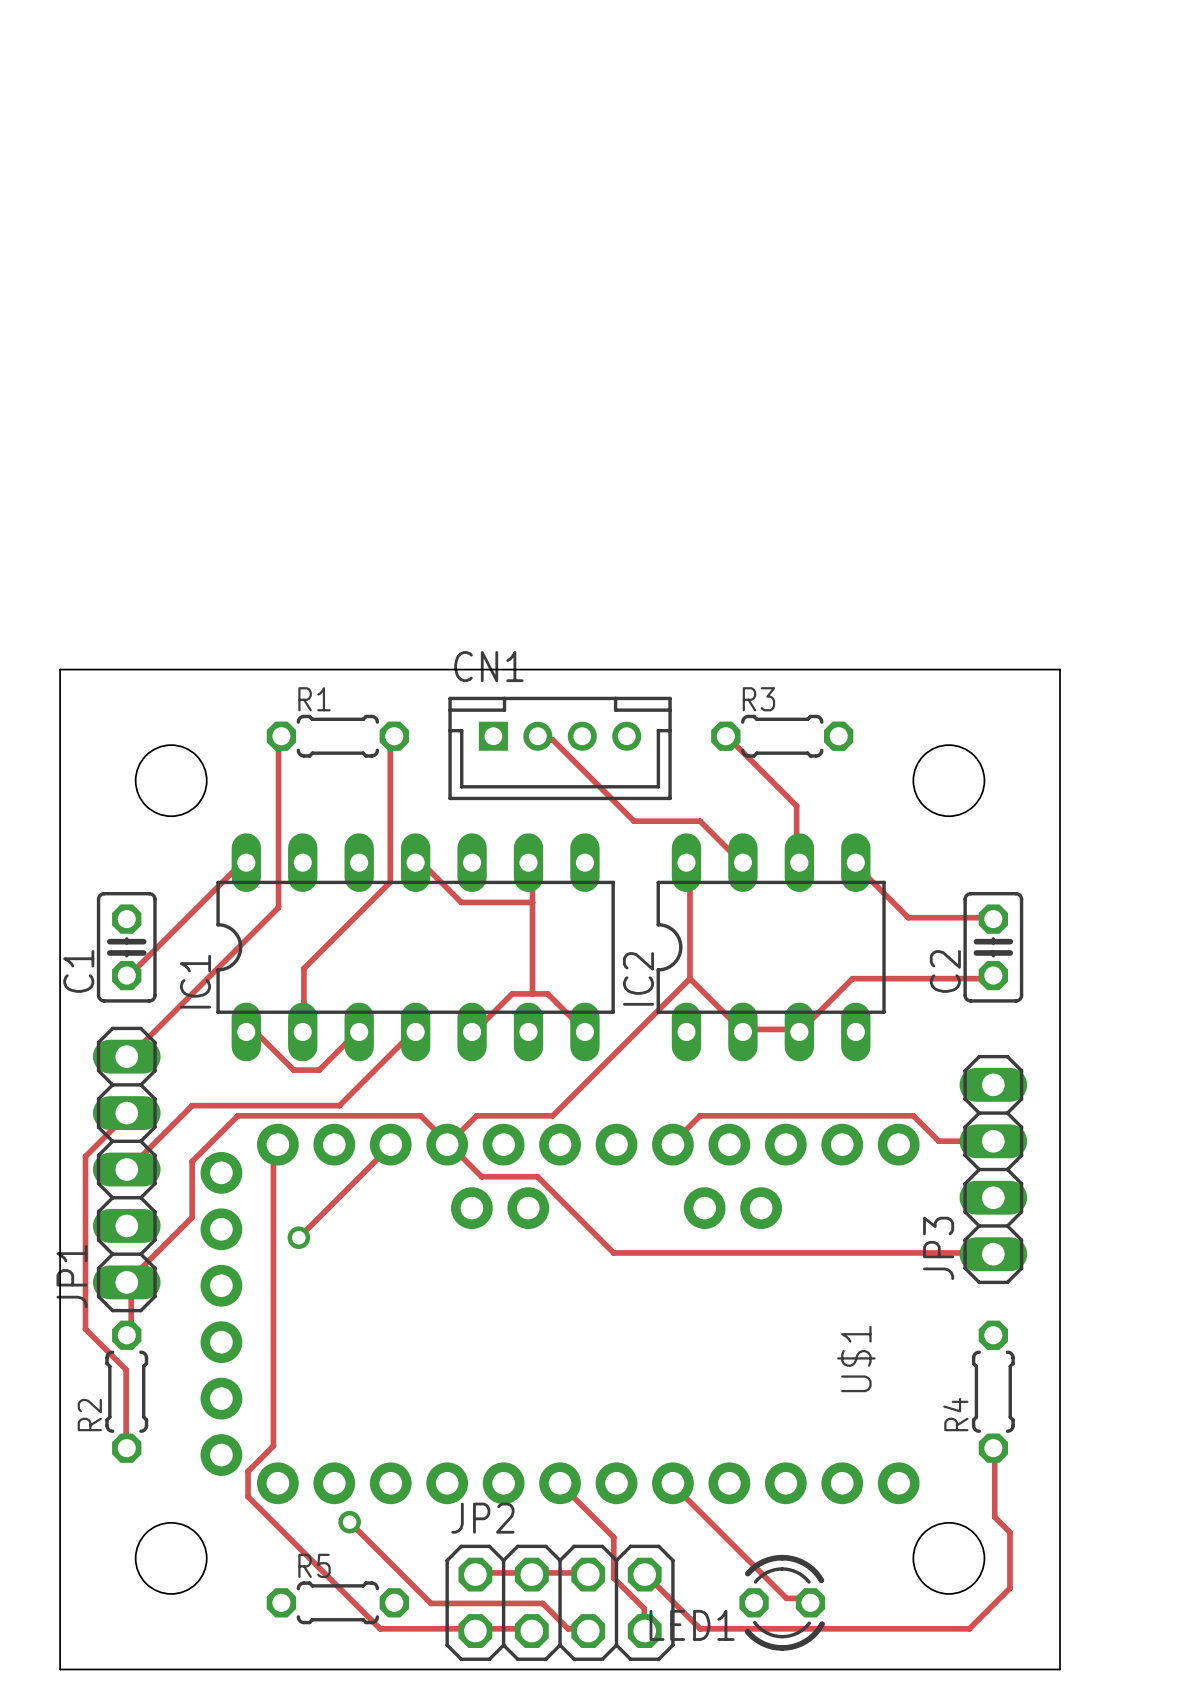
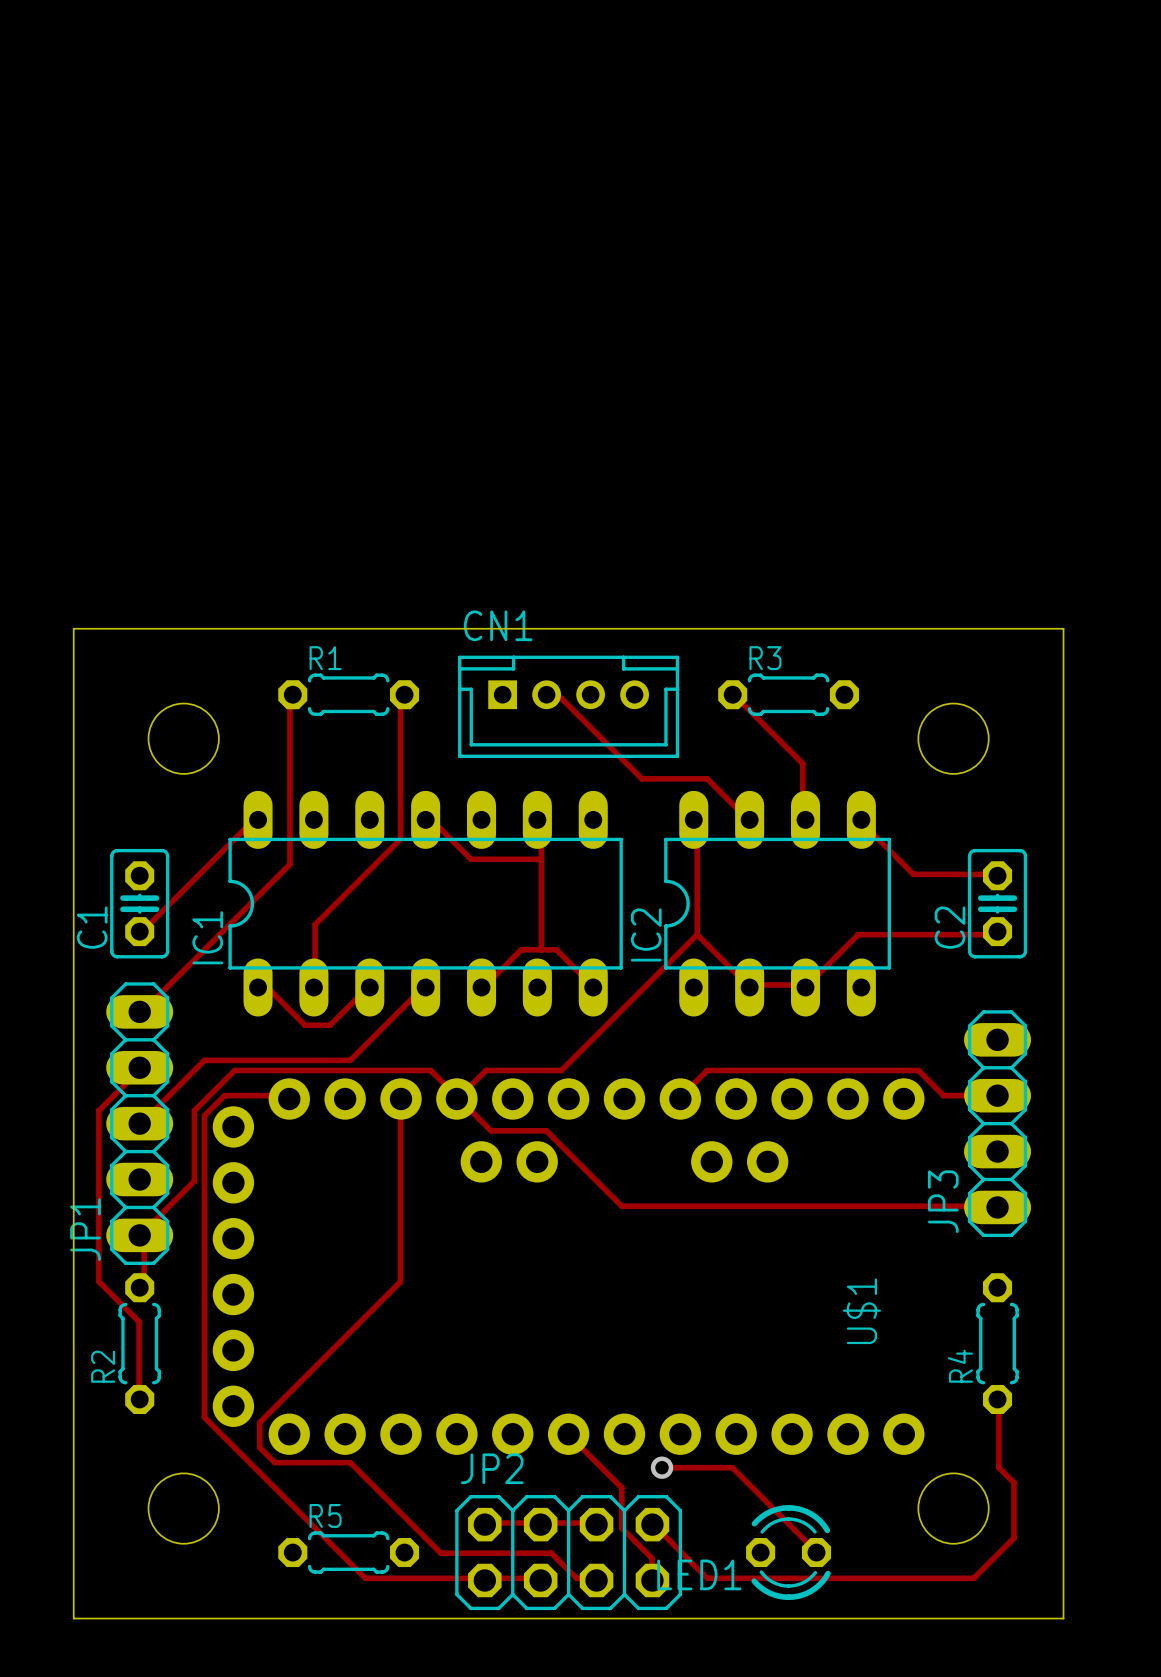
track: (237, 1115) (212, 1141) -> (289, 1099) (284, 1095) (224, 1095)
track: (277, 1144) (273, 1146) (273, 1445) -> (400, 1100) (400, 1281) (284, 1397)
track: (390, 1146) (298, 1237) -> none
track: (192, 1217) (182, 1227) -> (249, 1070) (234, 1070) (194, 1110) (194, 1181)
track: none -> (204, 1171) (204, 1417) (365, 1578) (390, 1578)
via: (298, 1237) -> none
track: (672, 1483) (786, 1598) (806, 1598) -> (662, 1467) (732, 1467) (812, 1548)
track: (263, 1512) (380, 1628) -> (274, 1462) (350, 1462) (360, 1472)
via: none -> (662, 1467)
via: (349, 1522) -> none

